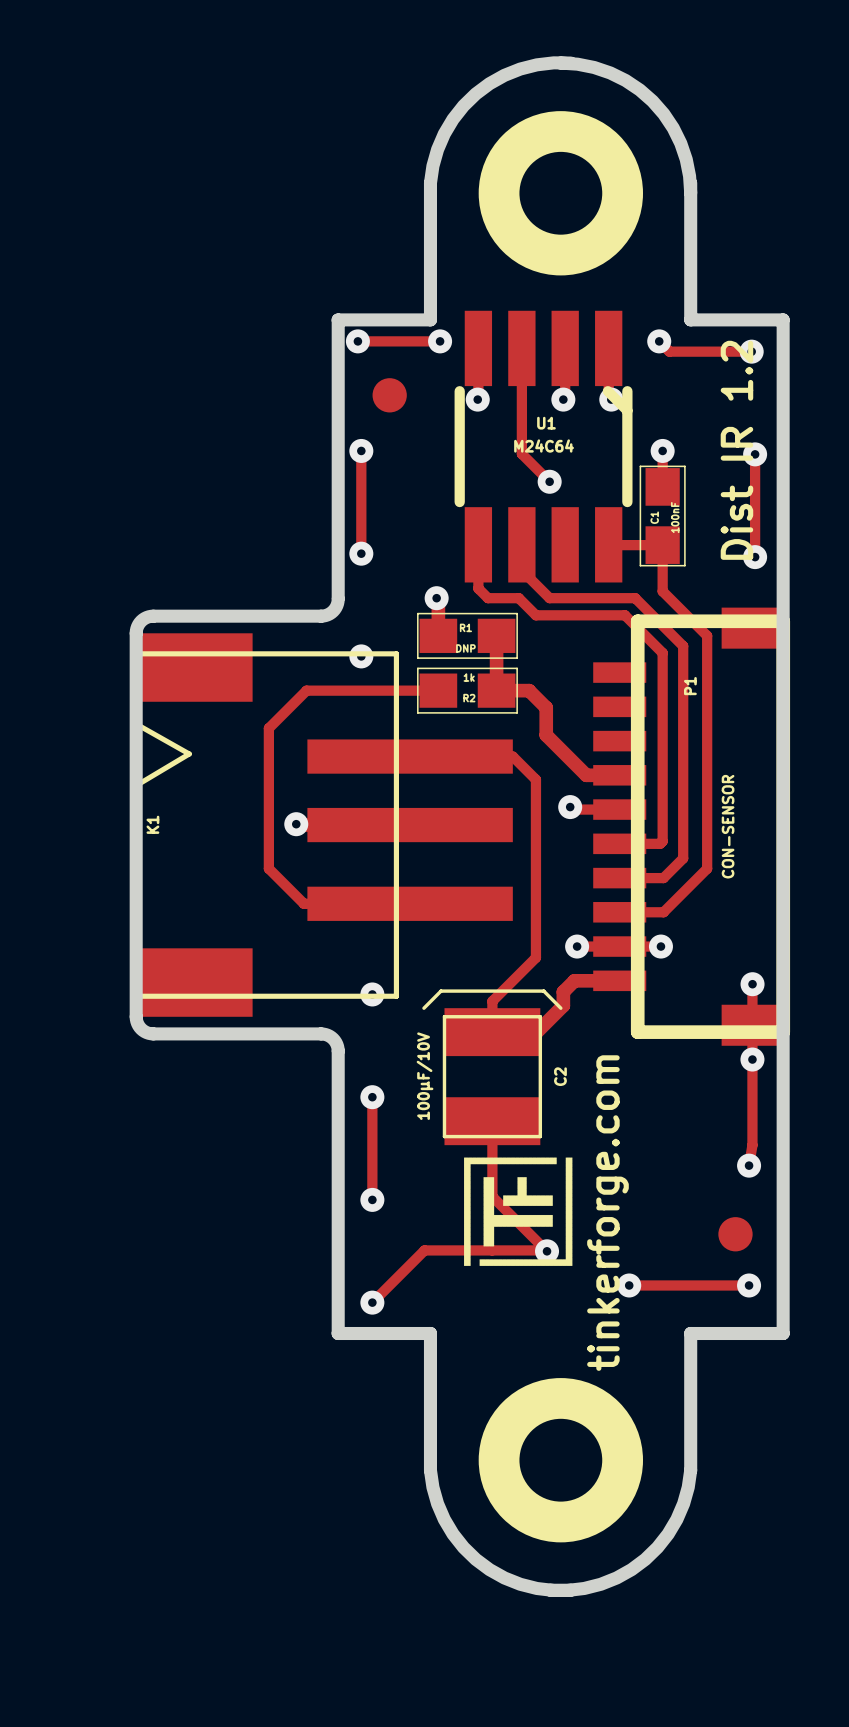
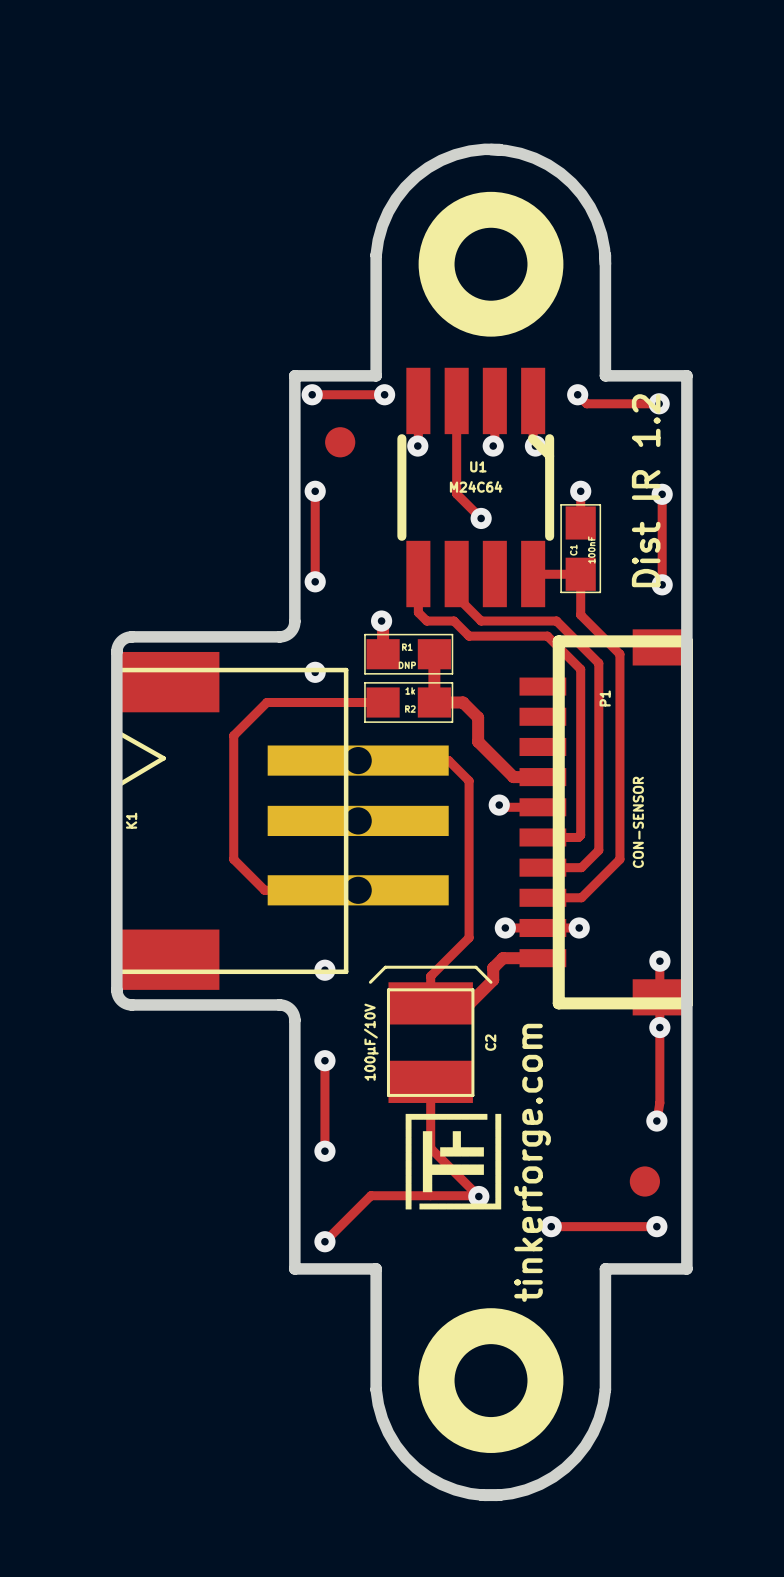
K1 footprint: [133, 633, 513, 1017] -> [114, 651, 449, 990]
via: (296, 824) -> none

